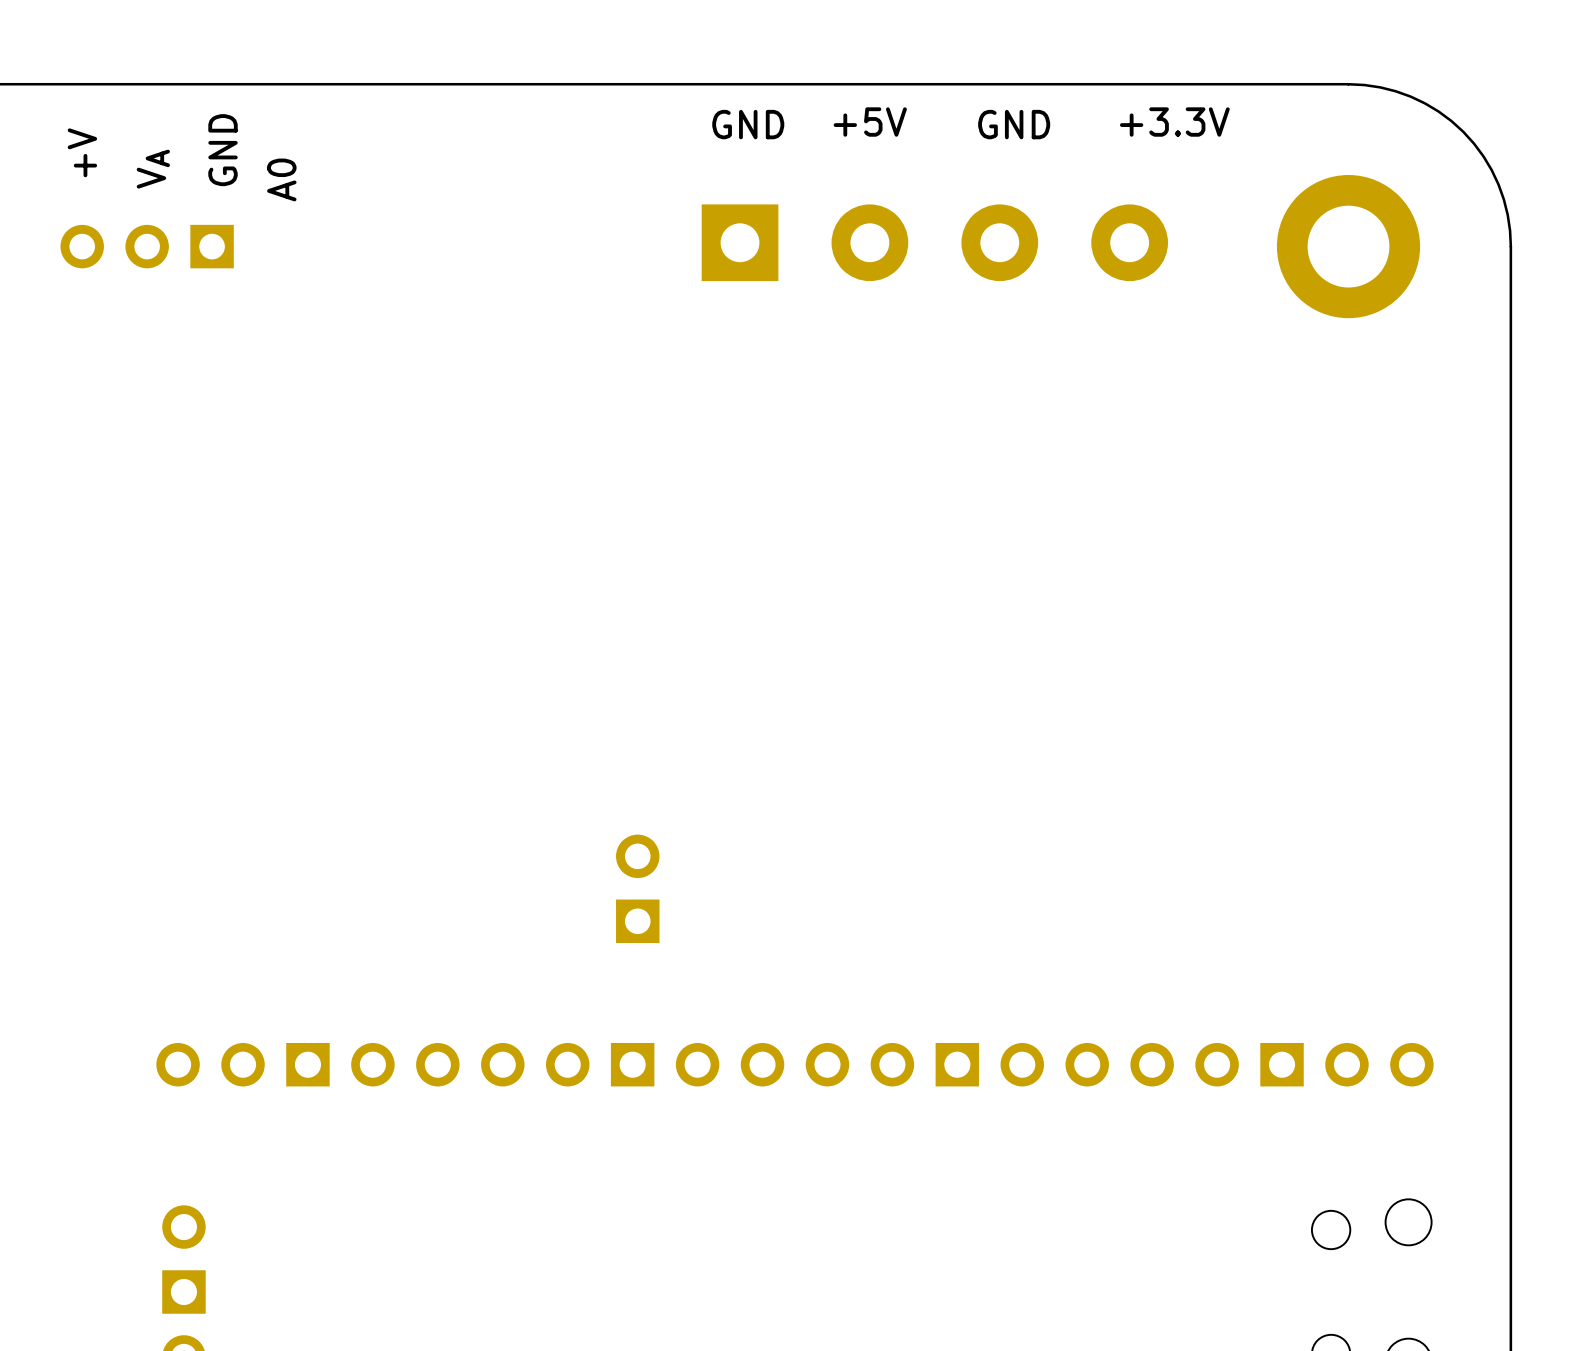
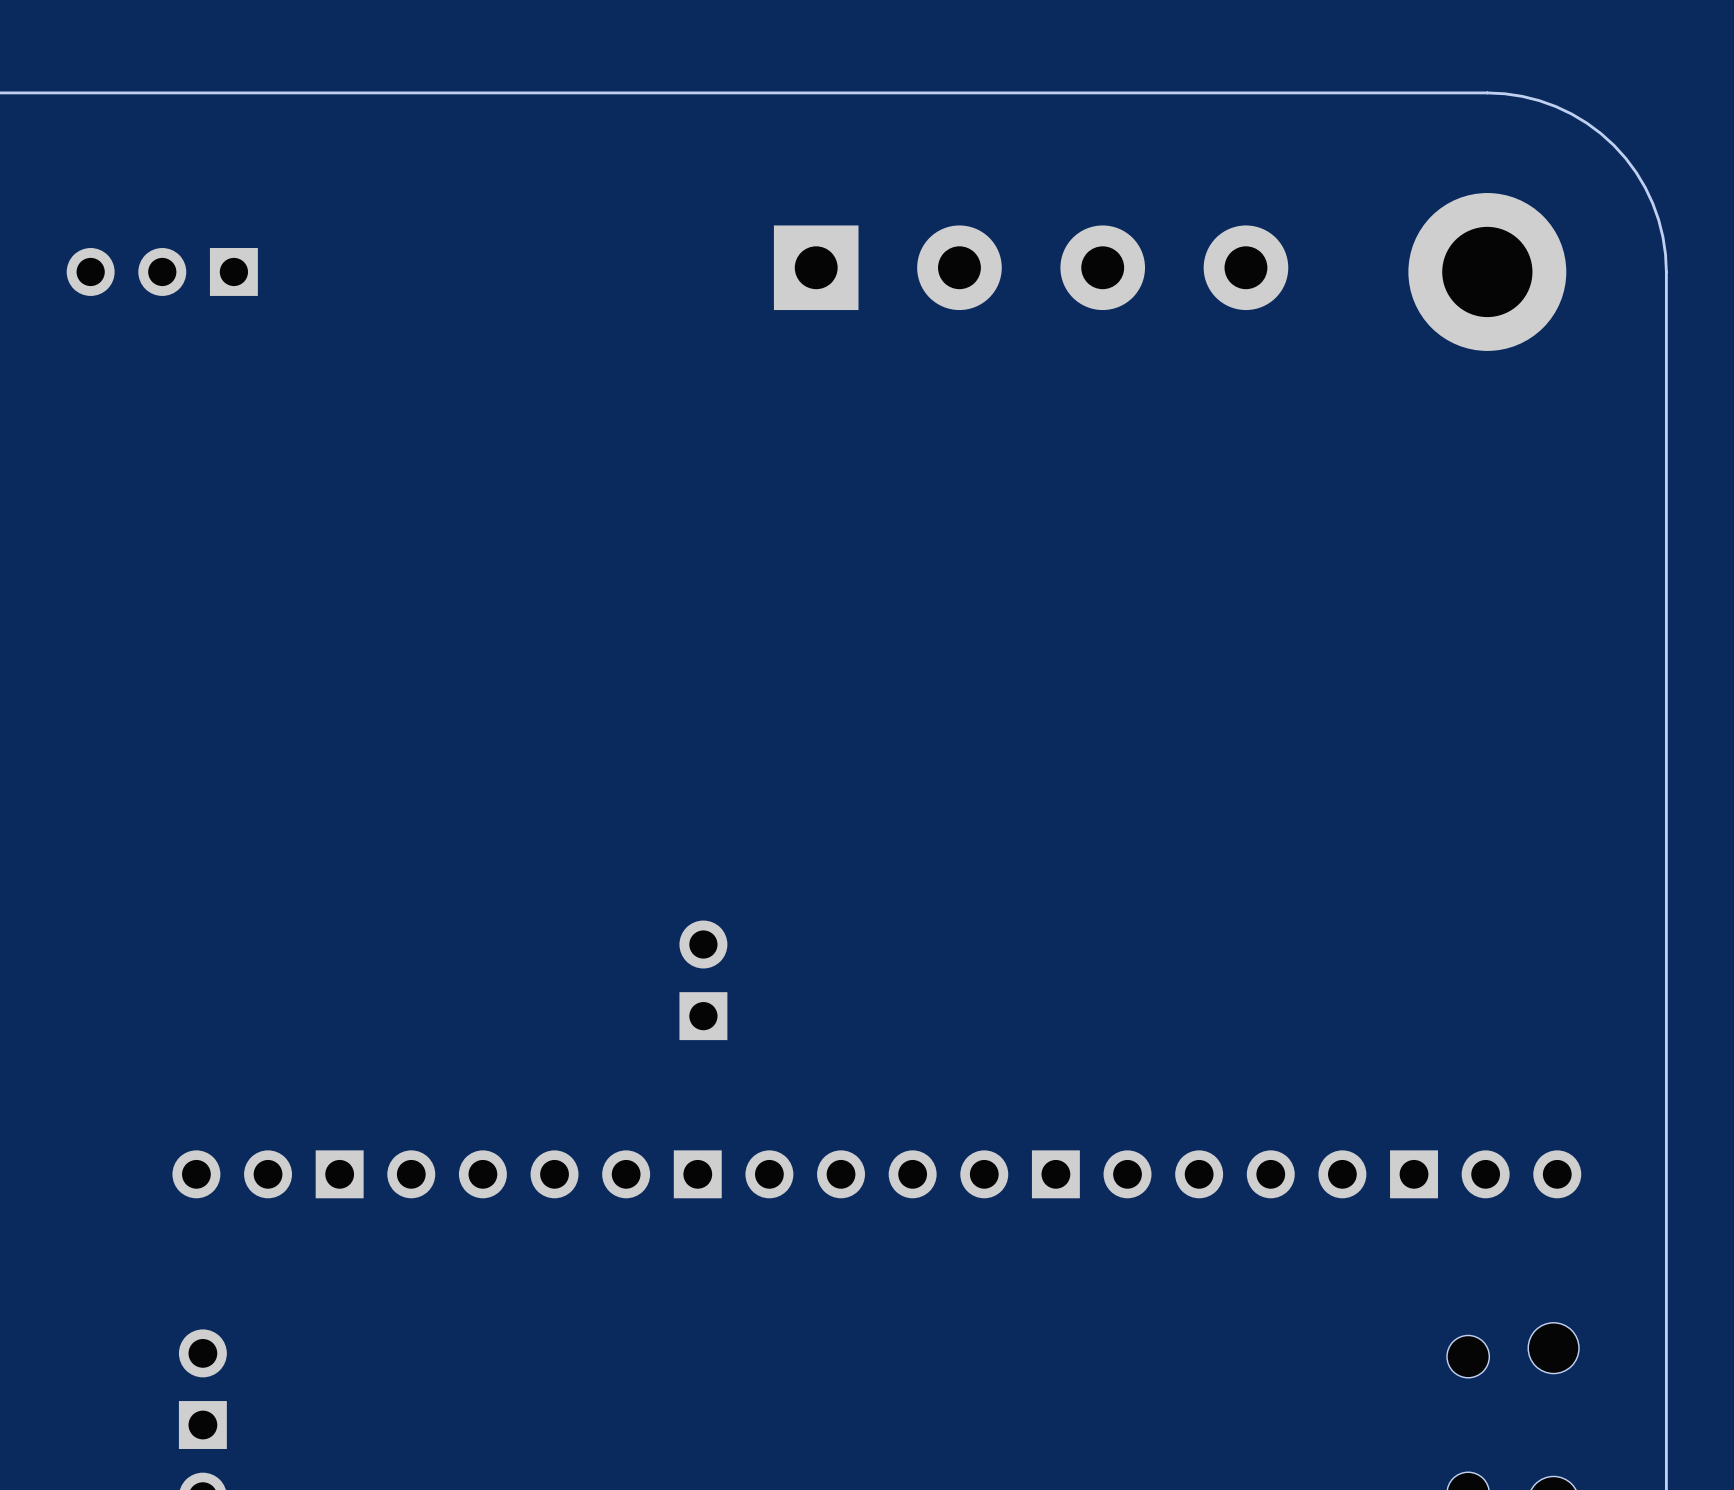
text: +5V (870, 122) -> none
text: +3.3V (1174, 122) -> none
text: GND (748, 124) -> none
text: GND (1014, 124) -> none
text: GND (223, 150) -> none
text: +V (82, 152) -> none
text: VA (153, 169) -> none
text: A0 (281, 179) -> none

